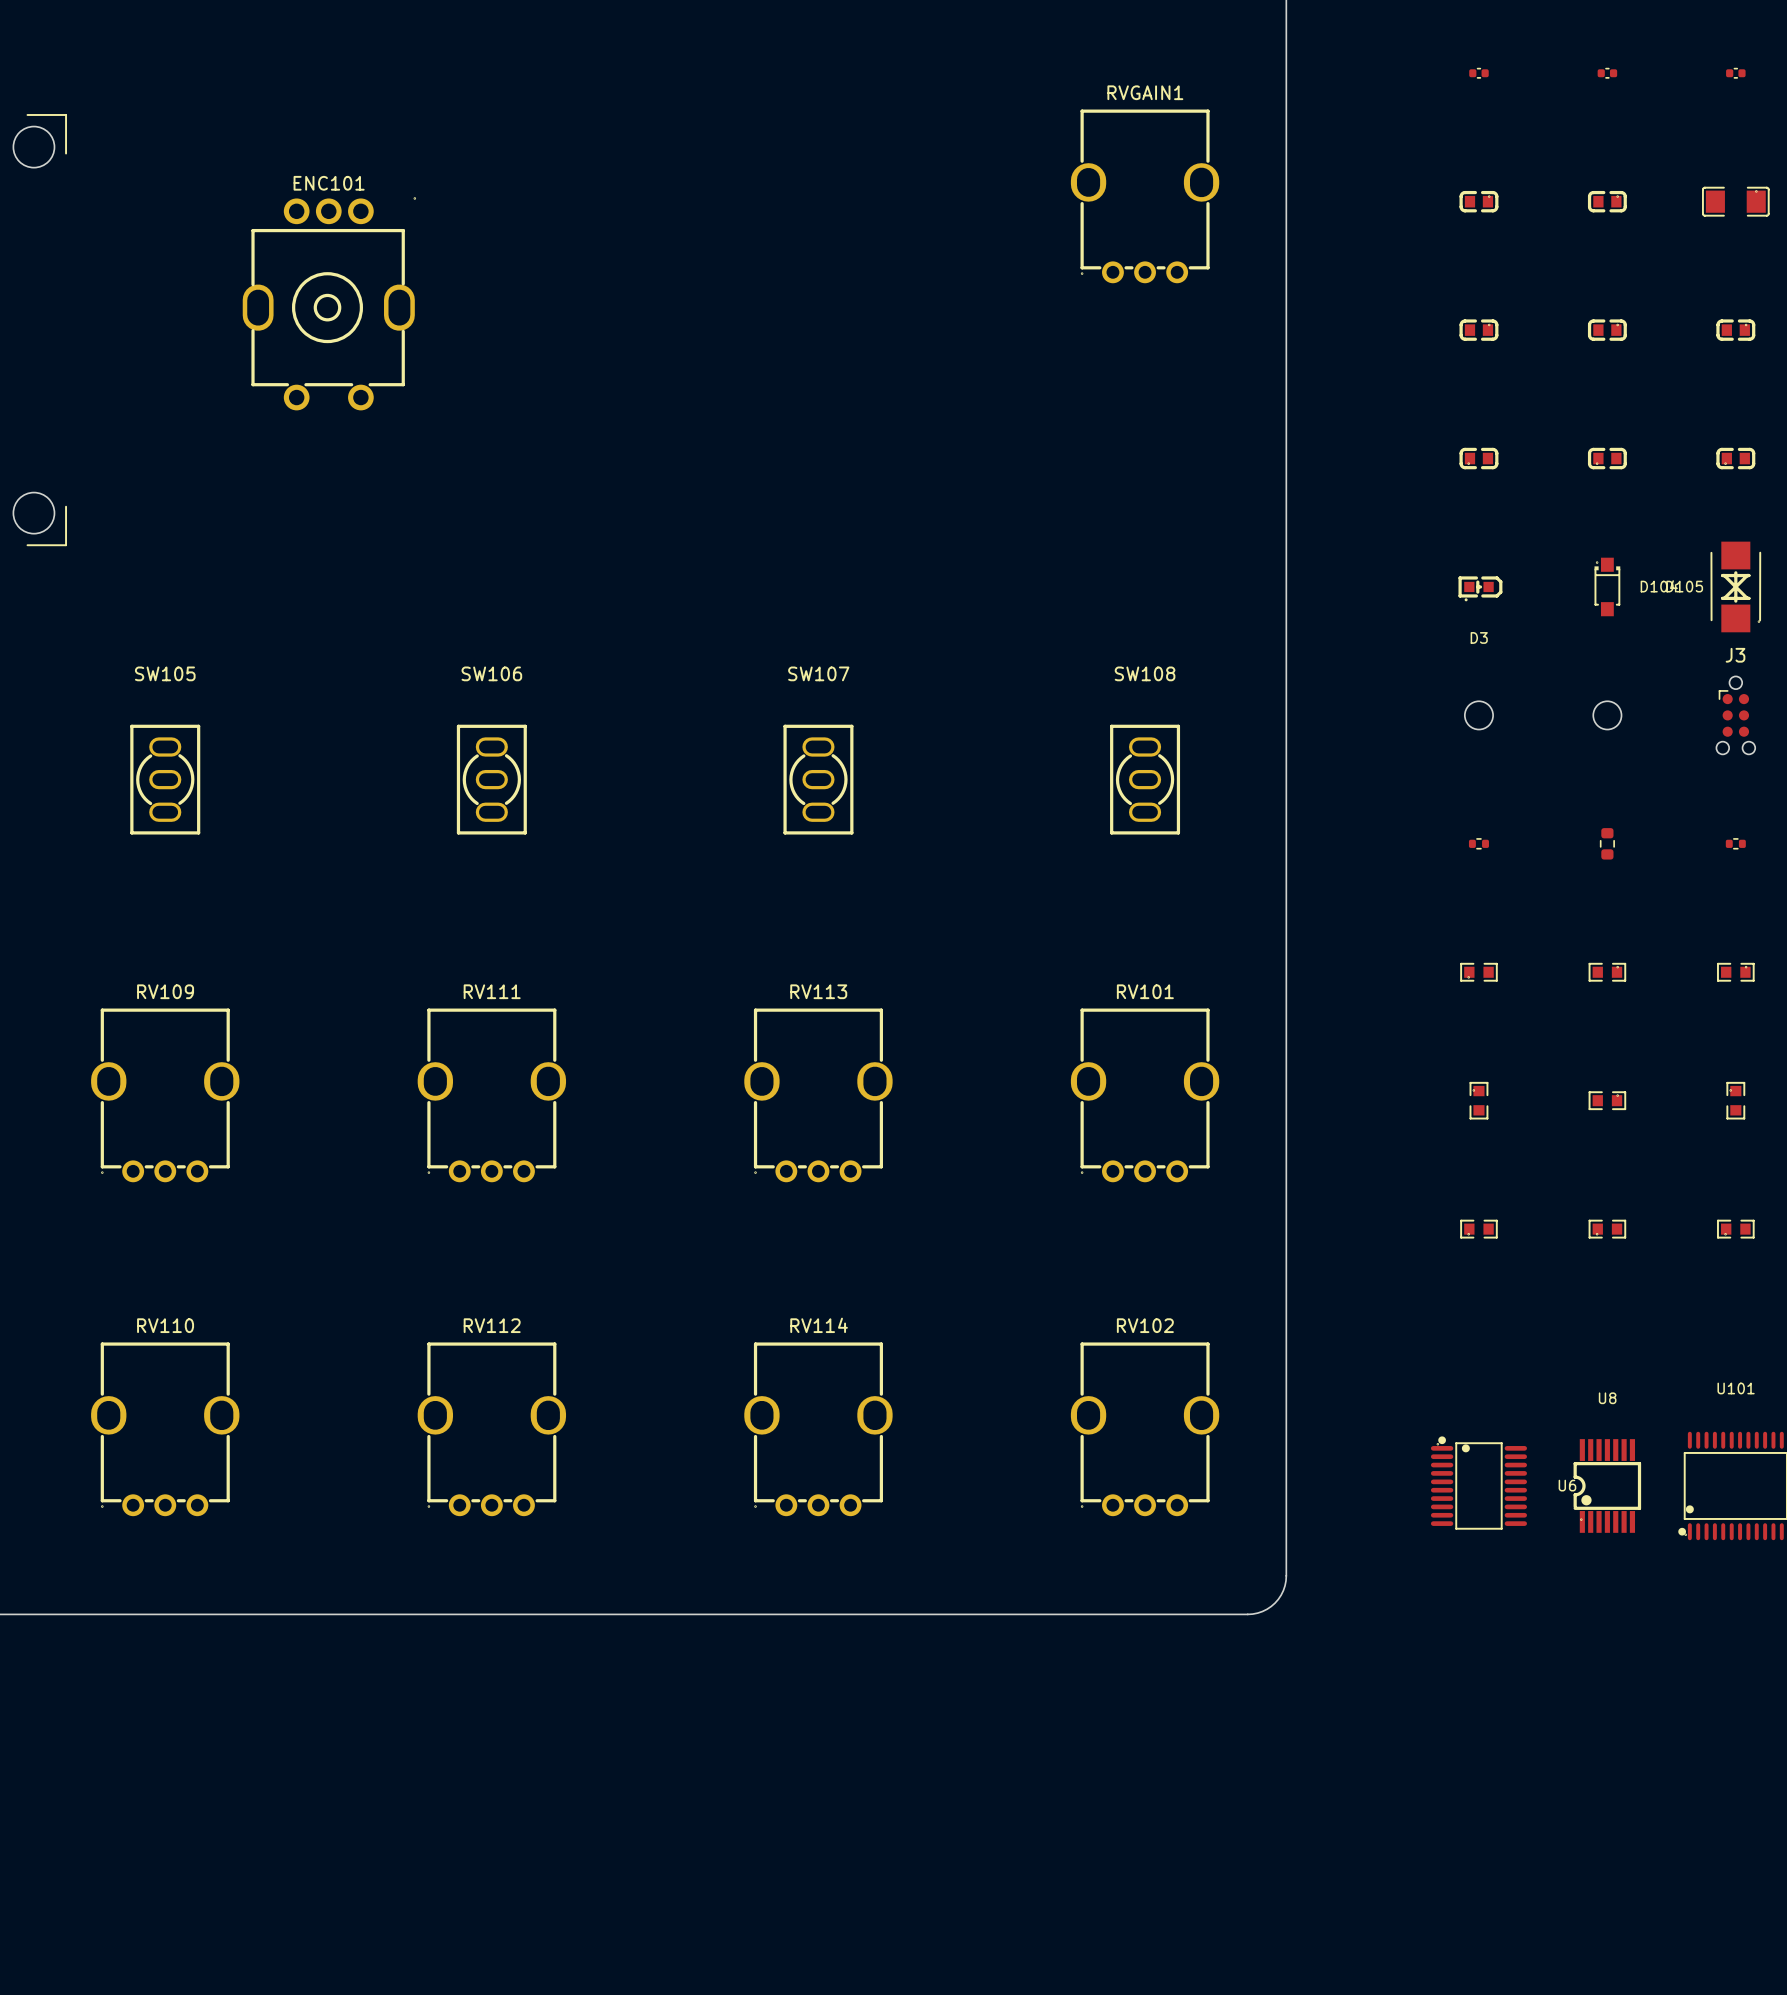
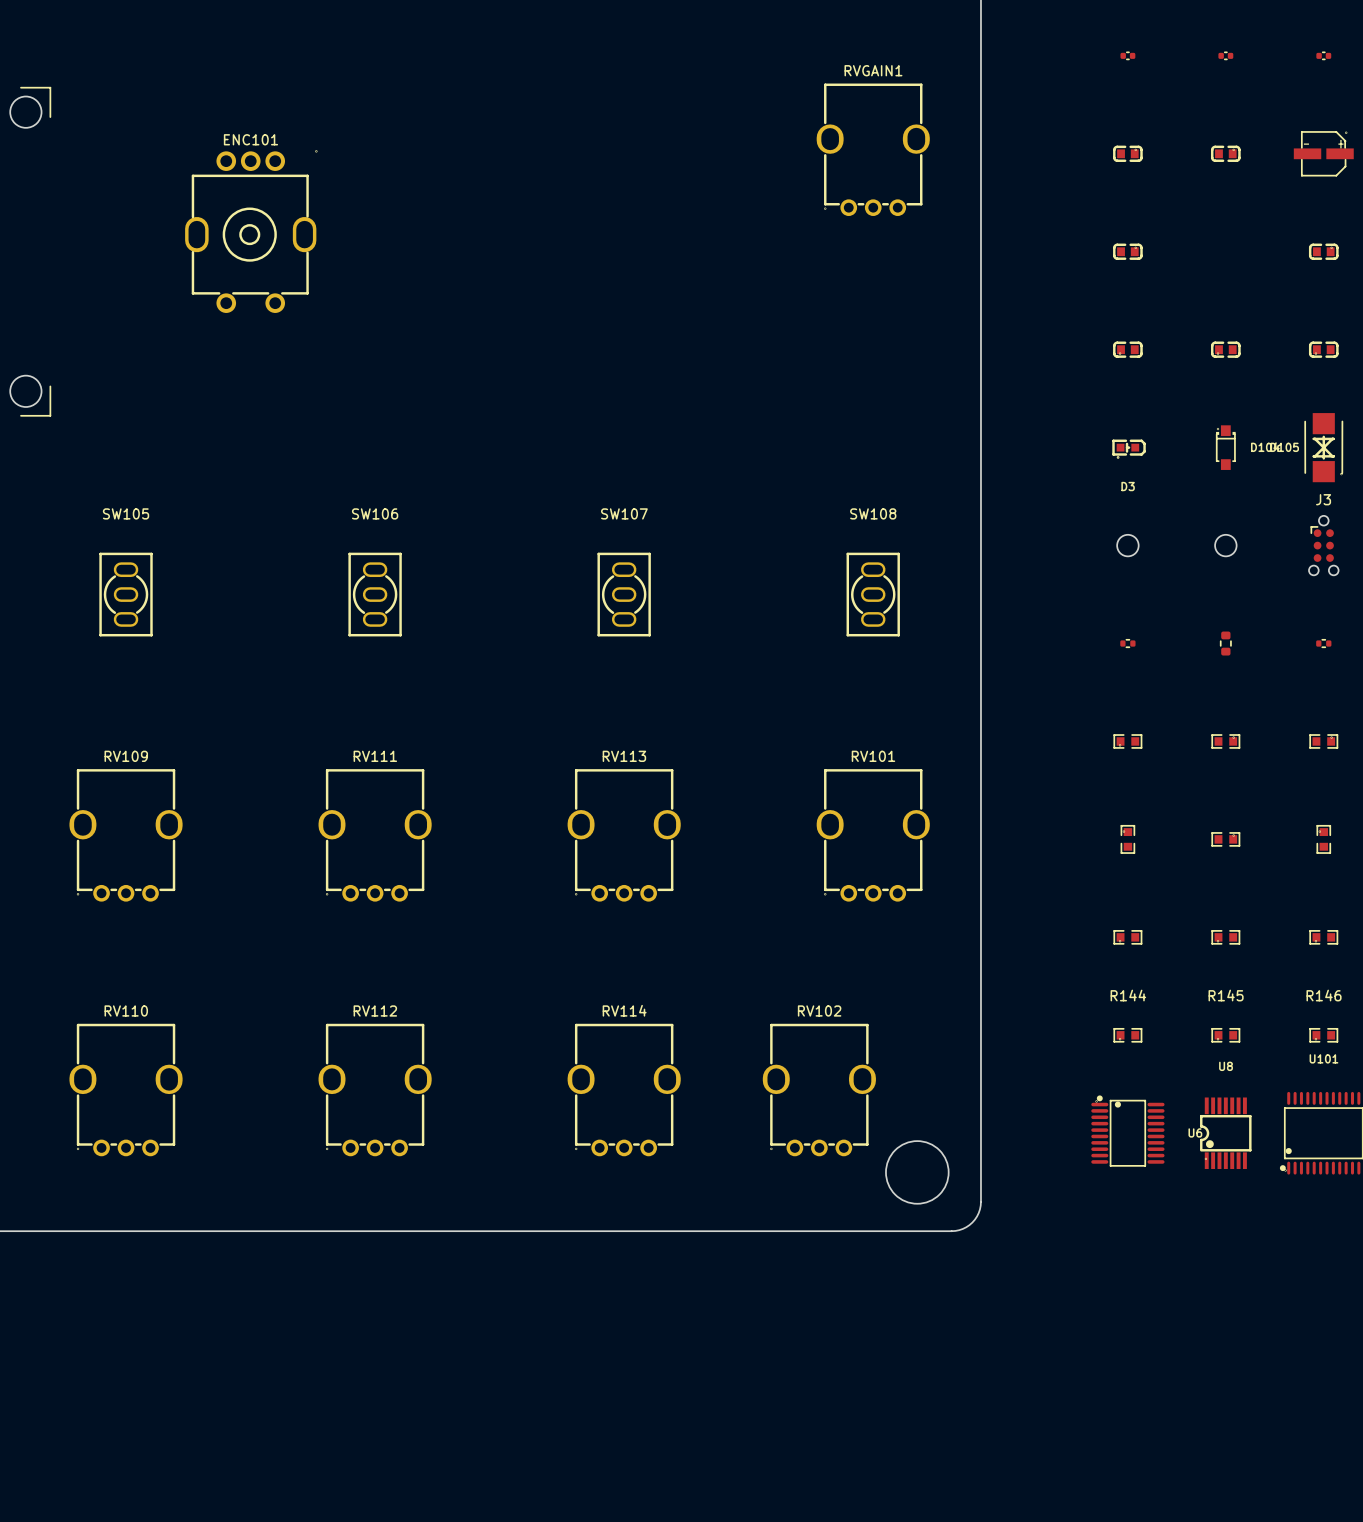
part footprint: [1701, 186, 1770, 217] -> [1293, 131, 1354, 177]
part: (1607, 330) -> none
R144: none -> (1127, 1035)
R145: none -> (1225, 1035)
R146: none -> (1323, 1035)
RV102 position: (1145, 1429) -> (819, 1090)
round board edge: none -> [885, 1140, 949, 1205]

